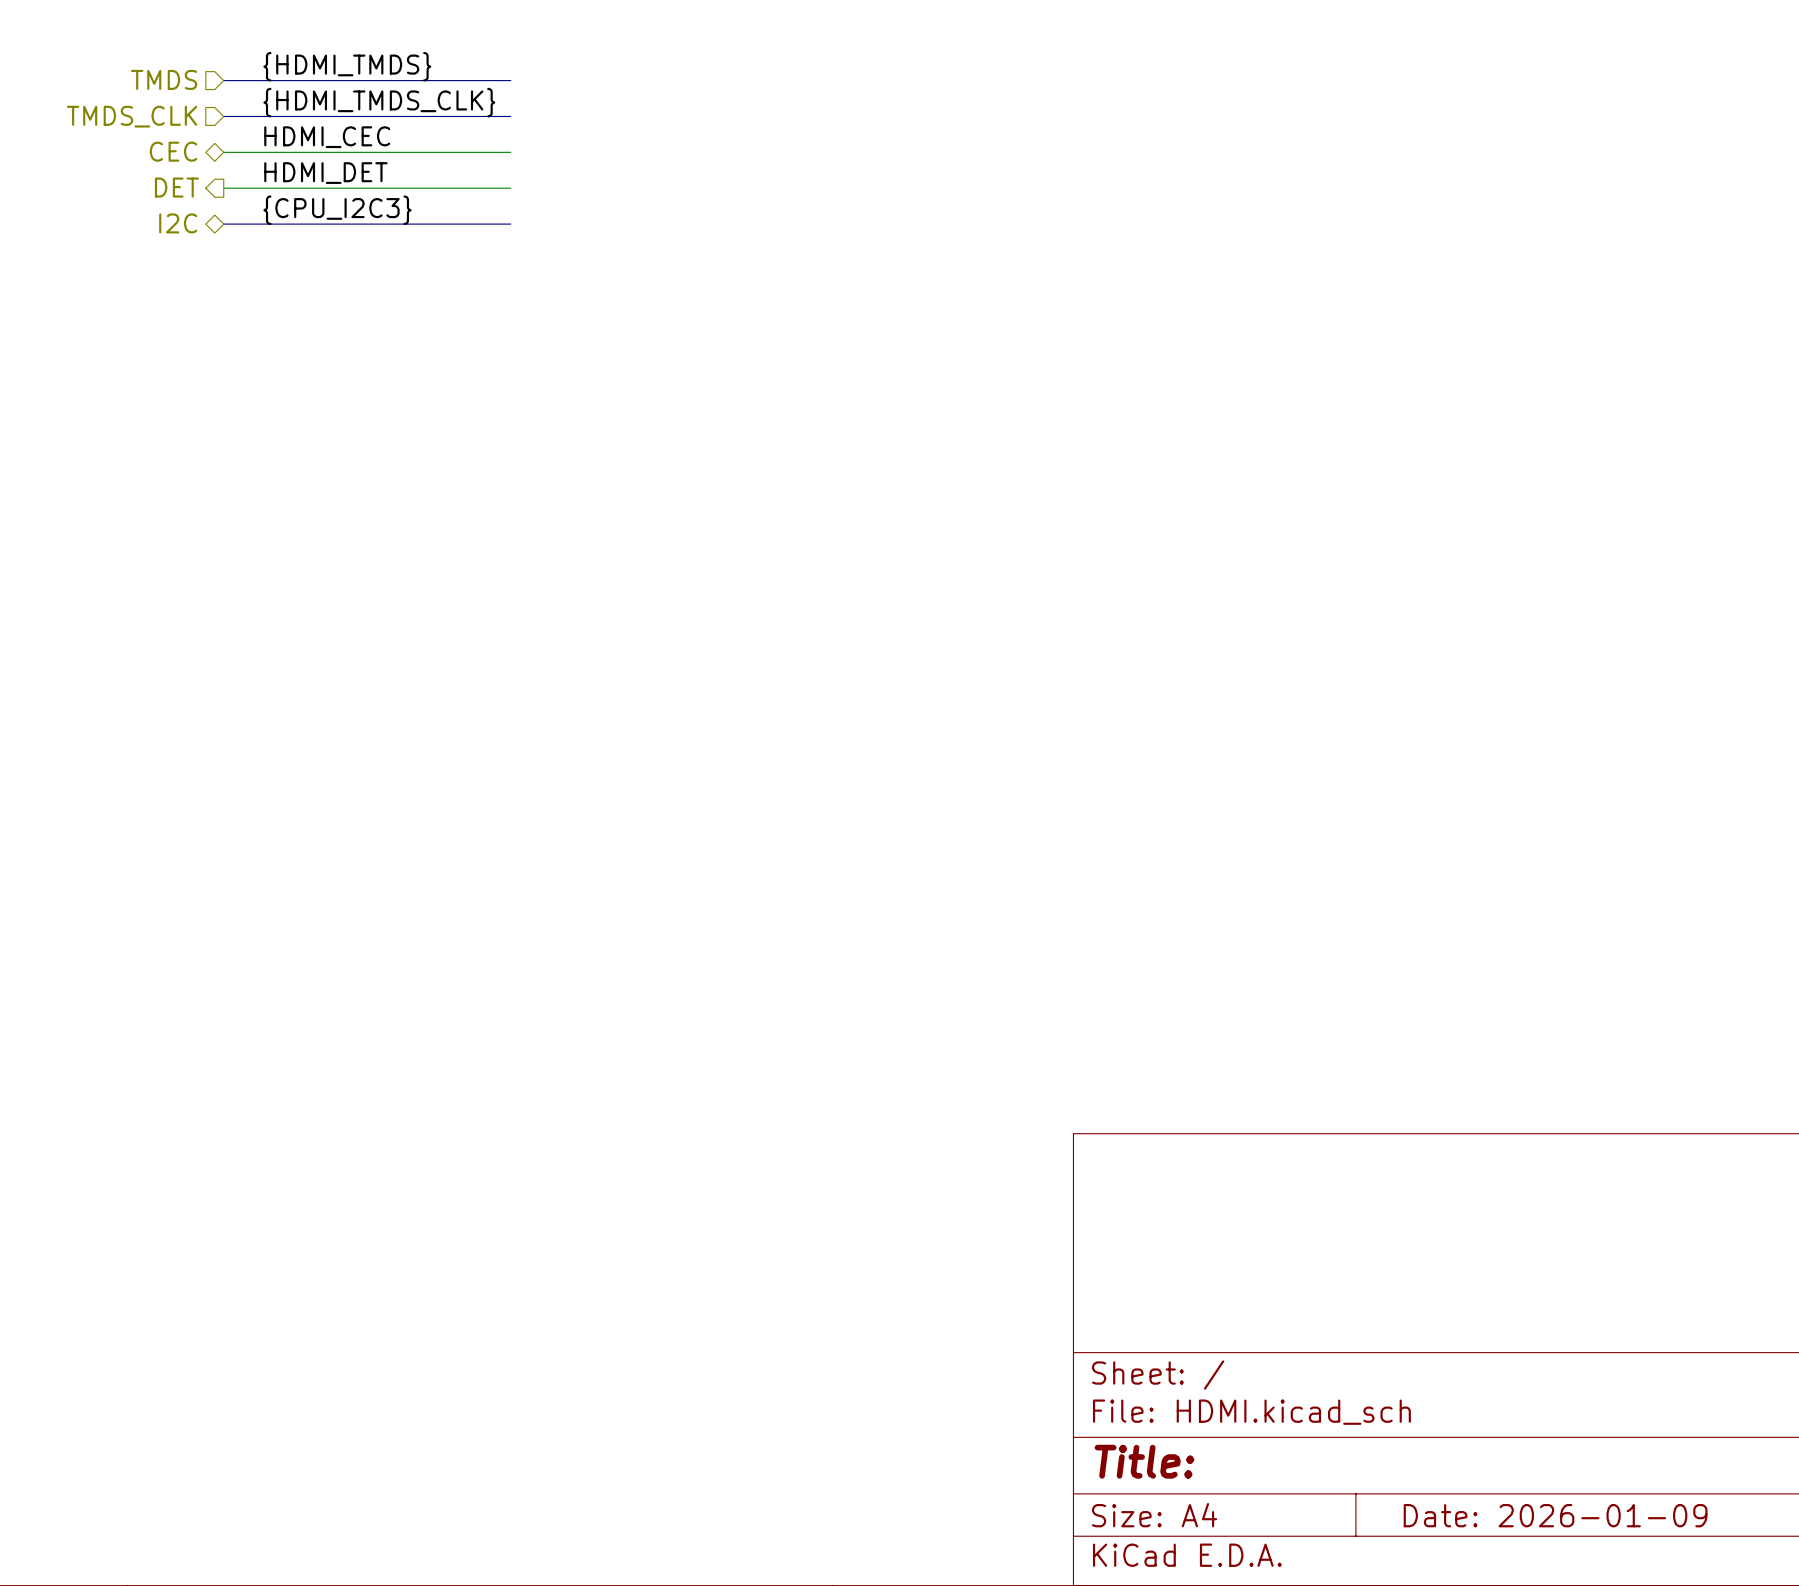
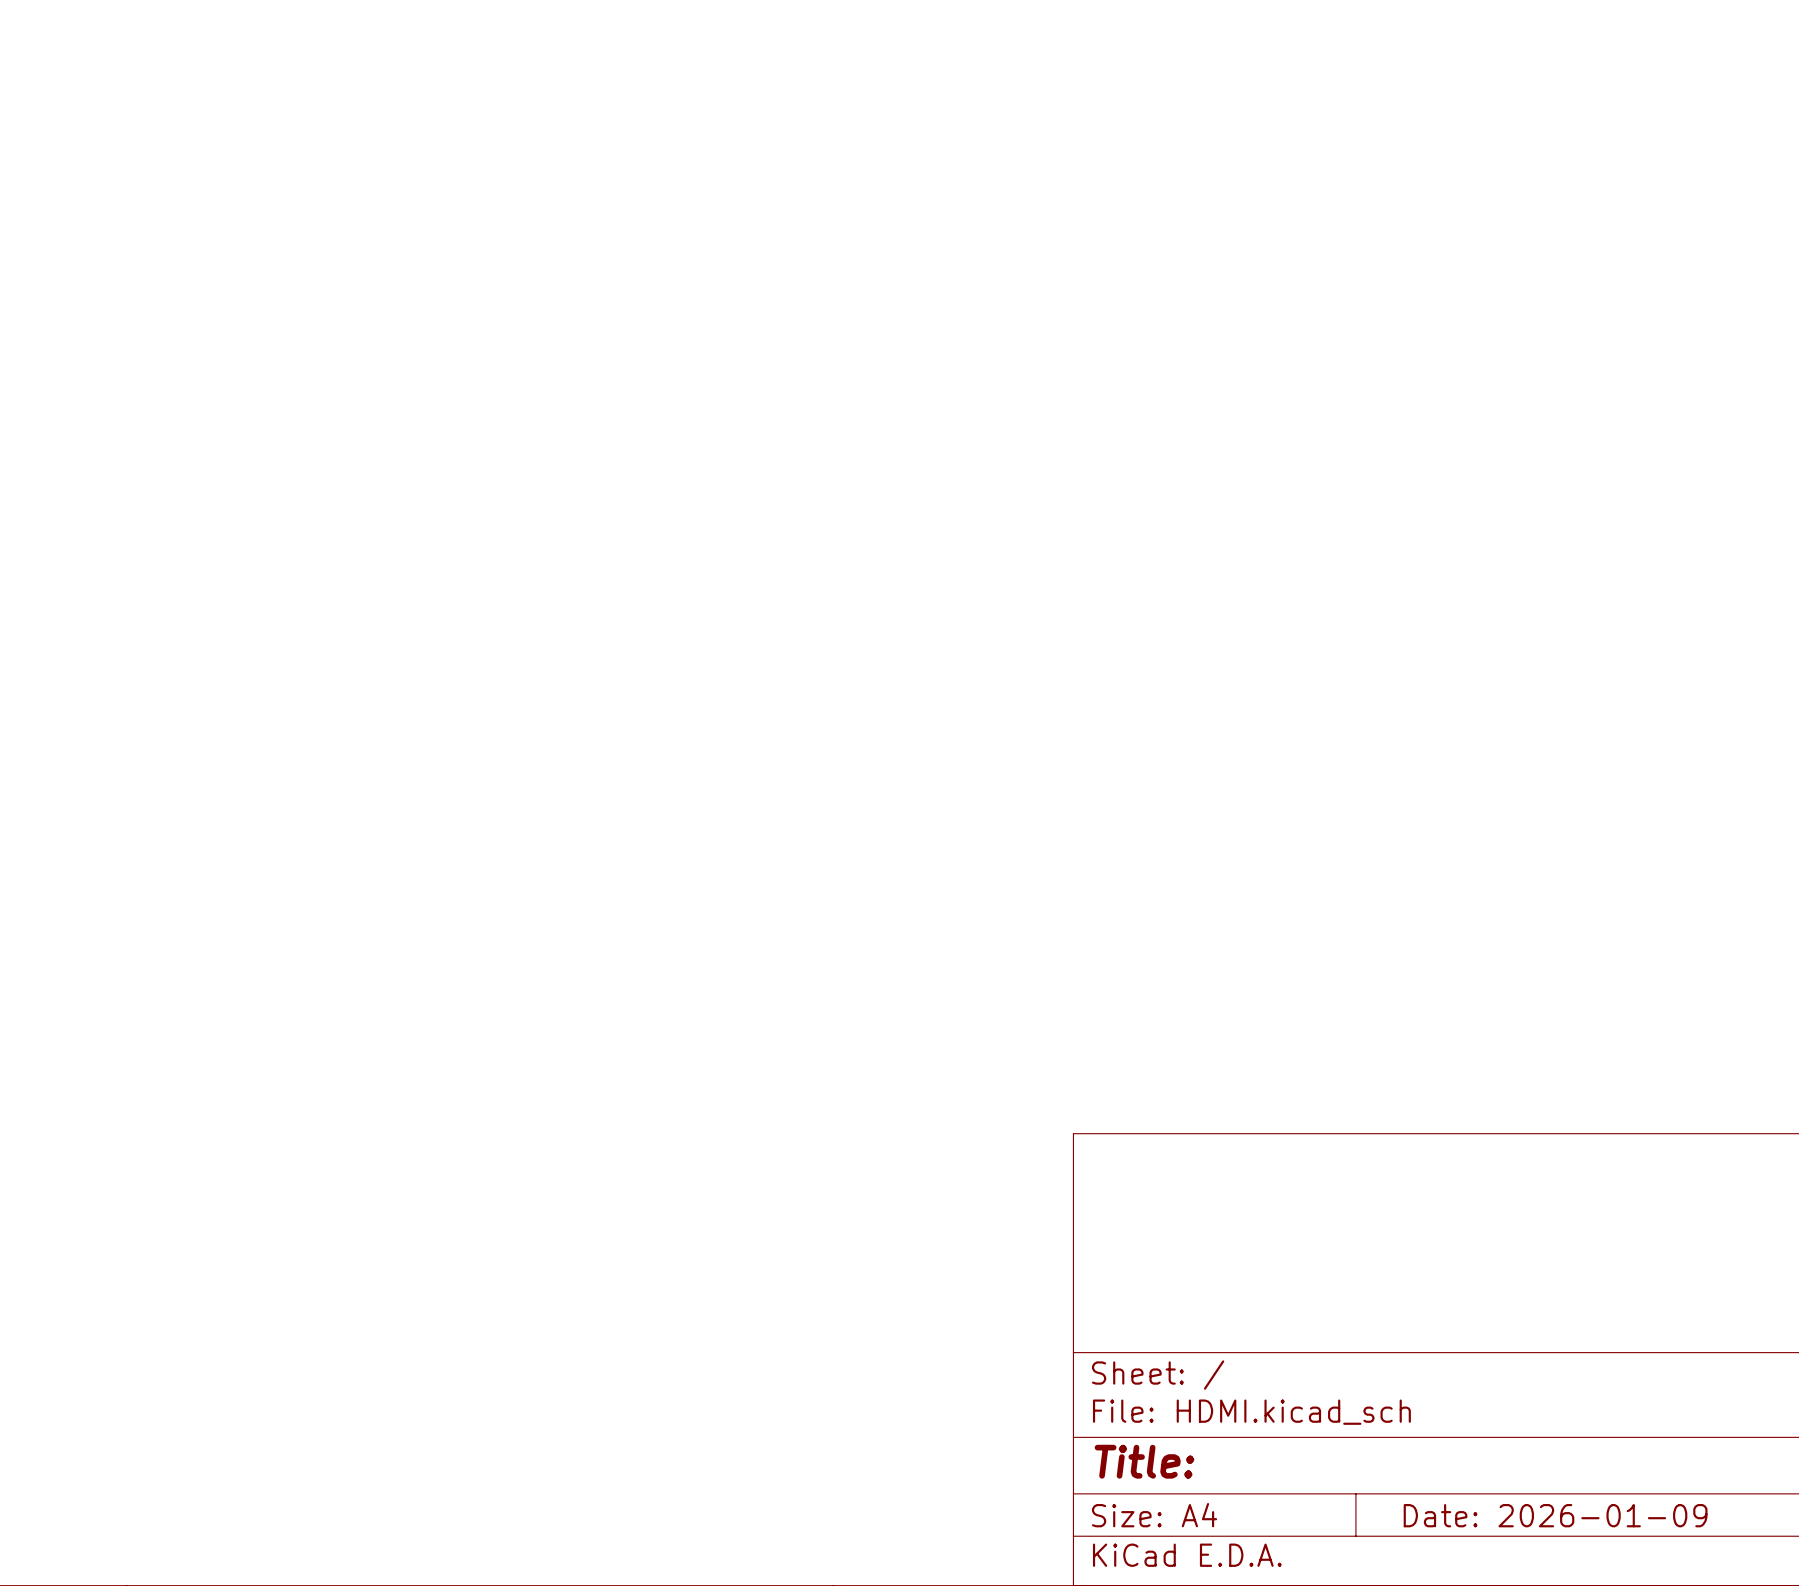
label: {HDMI_TMDS} (347, 66) -> none
hierarchical label: TMDS (164, 79) -> none
bus: (223, 80) (510, 80) -> none
label: {HDMI_TMDS_CLK} (379, 102) -> none
hierarchical label: TMDS_CLK (132, 116) -> none
bus: (223, 116) (510, 116) -> none
label: HDMI_CEC (327, 137) -> none
hierarchical label: CEC (173, 151) -> none
wire: (223, 152) (510, 152) -> none
label: HDMI_DET (325, 173) -> none
hierarchical label: DET (176, 187) -> none
wire: (223, 188) (510, 188) -> none
label: {CPU_I2C3} (337, 210) -> none
hierarchical label: I2C (178, 223) -> none
bus: (223, 224) (510, 224) -> none

